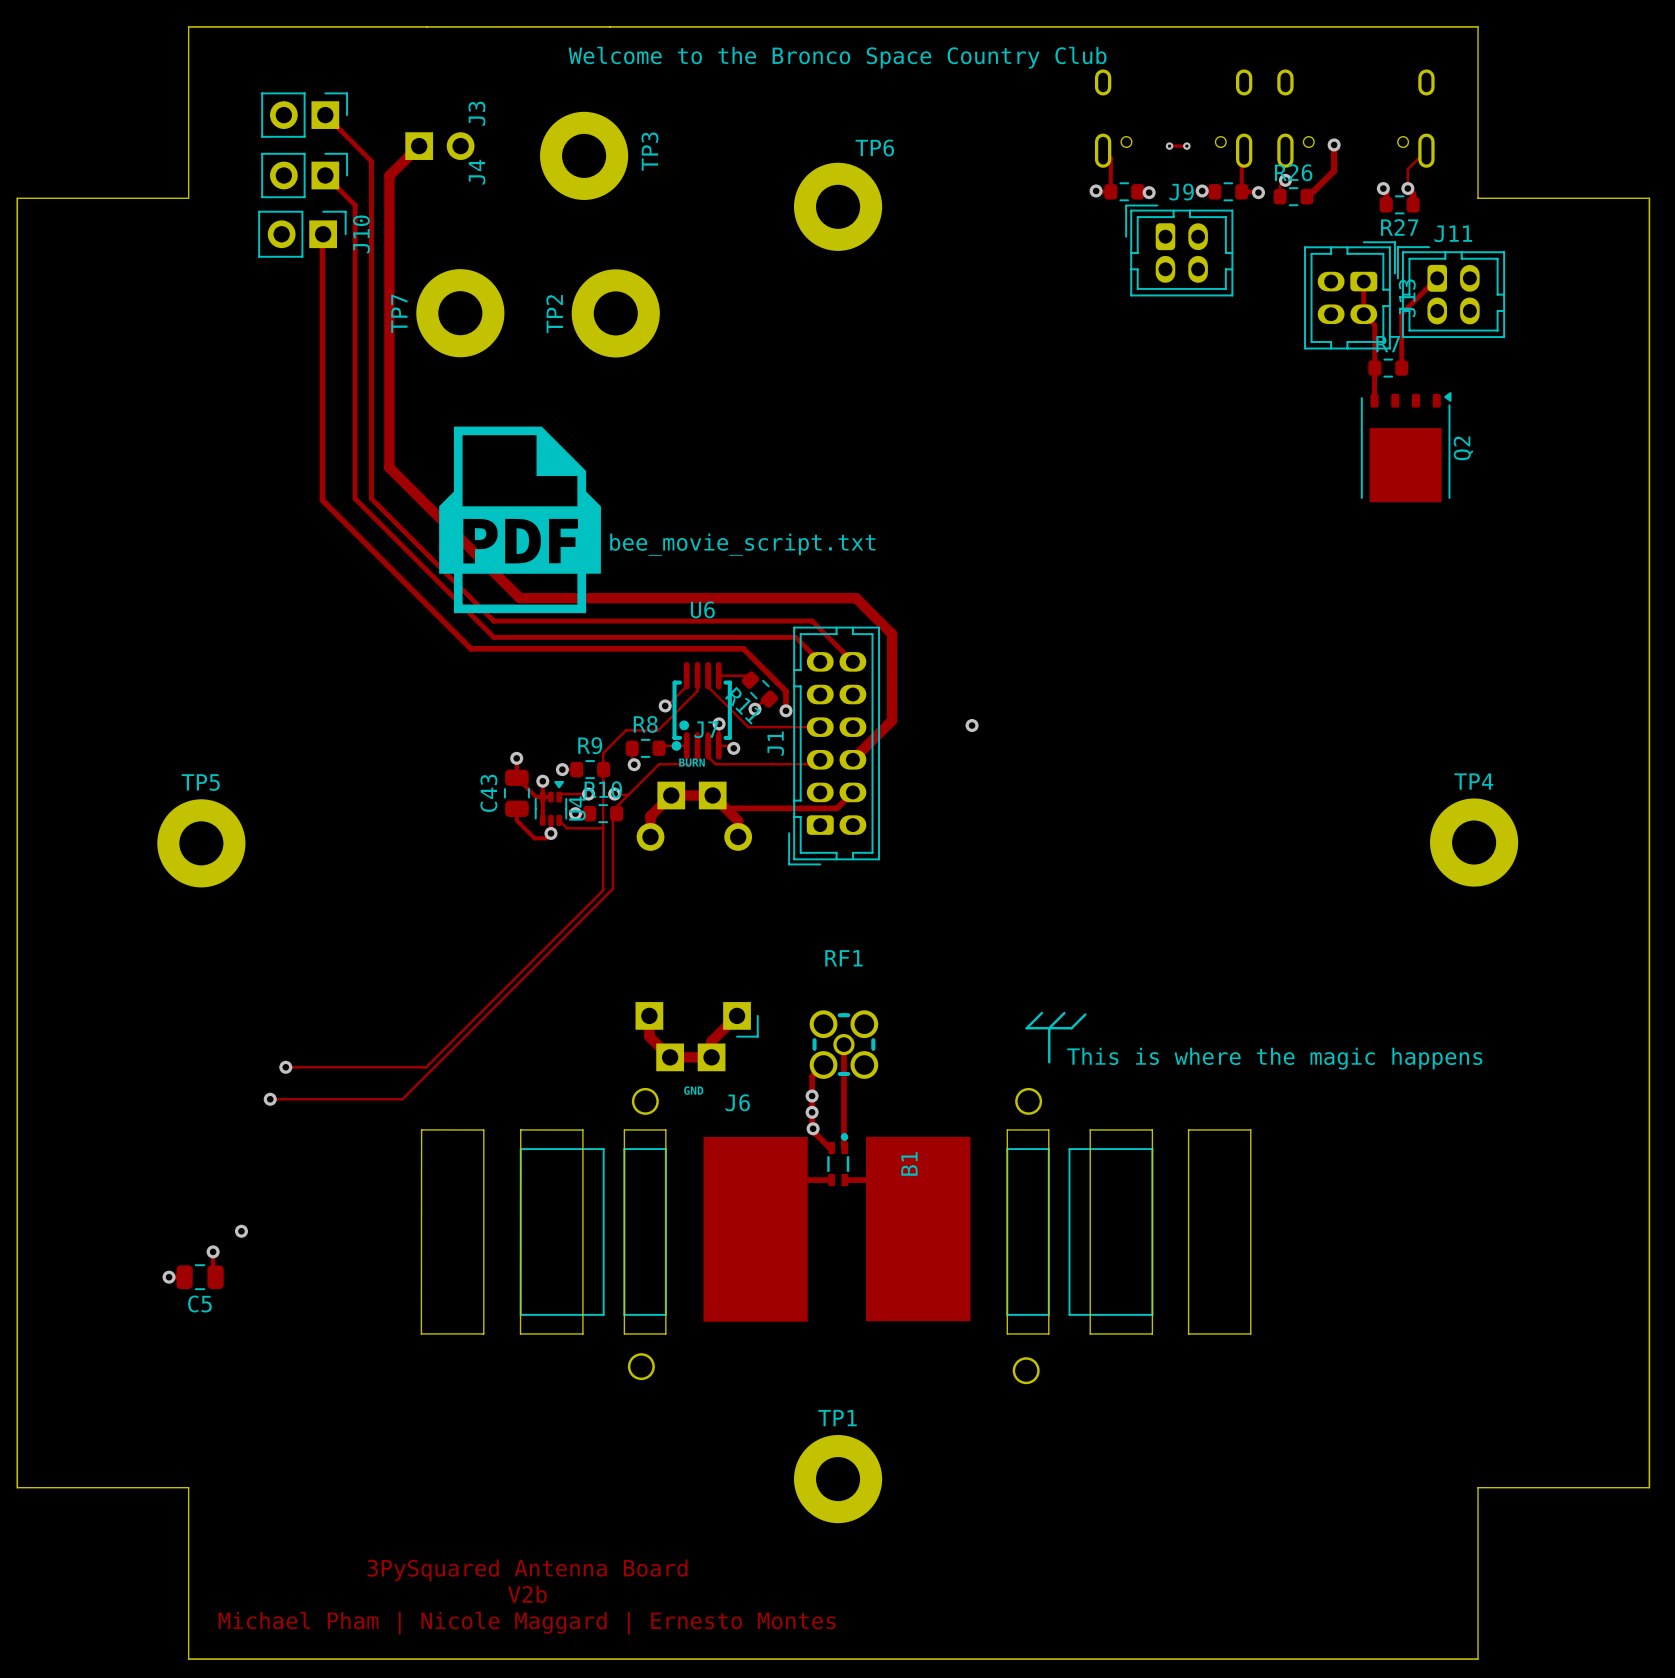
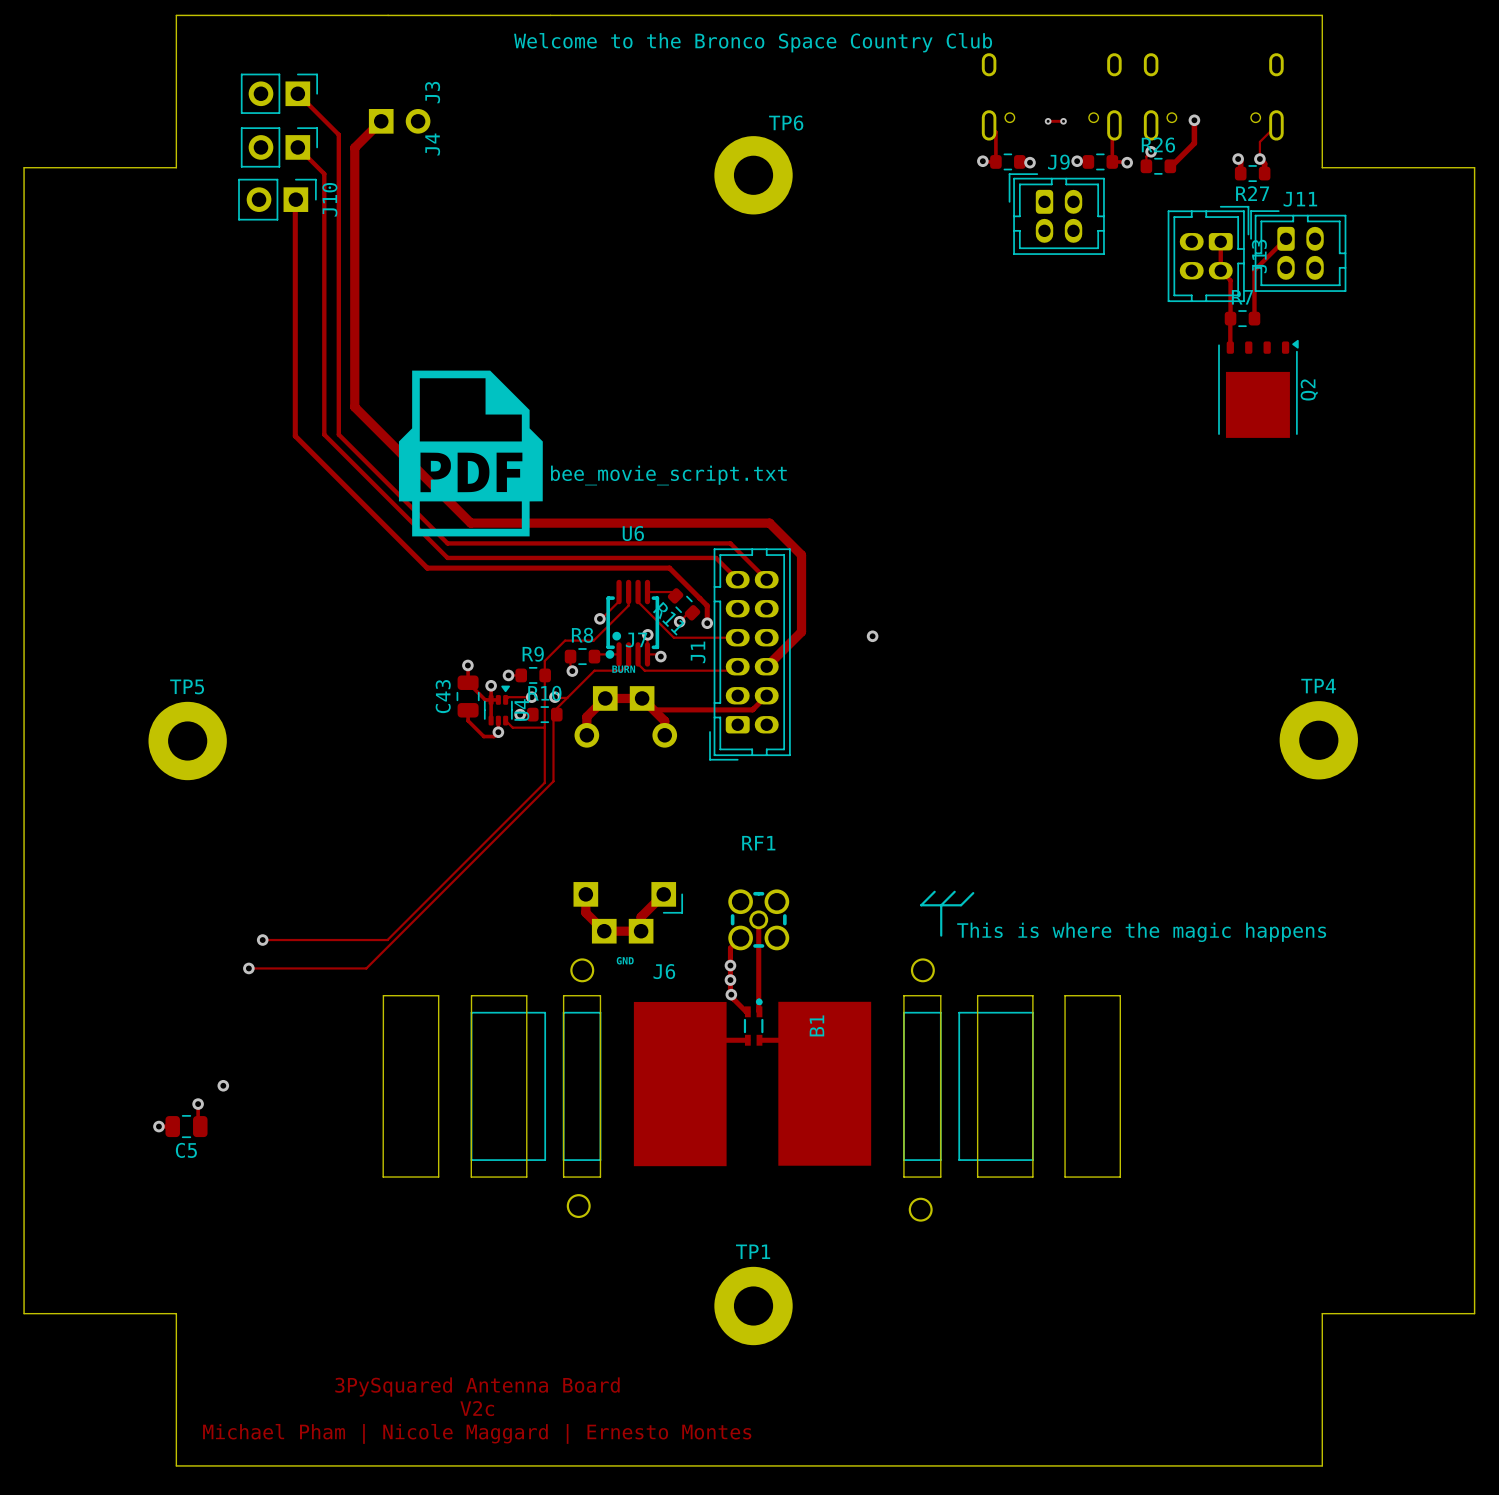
TP3: (584, 155) -> none
TP7: (460, 313) -> none
TP2: (615, 313) -> none
text: V2b (527, 1594) -> V2c (477, 1408)

